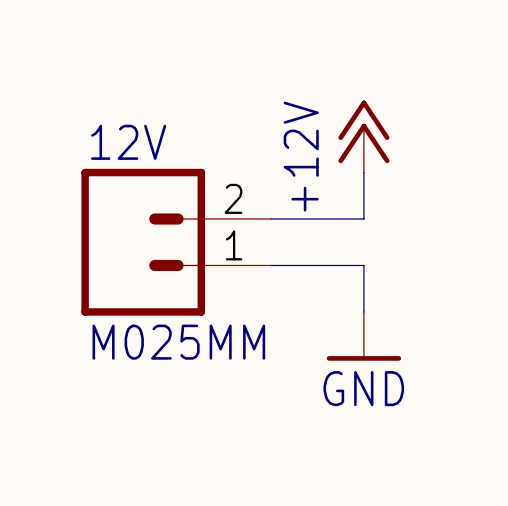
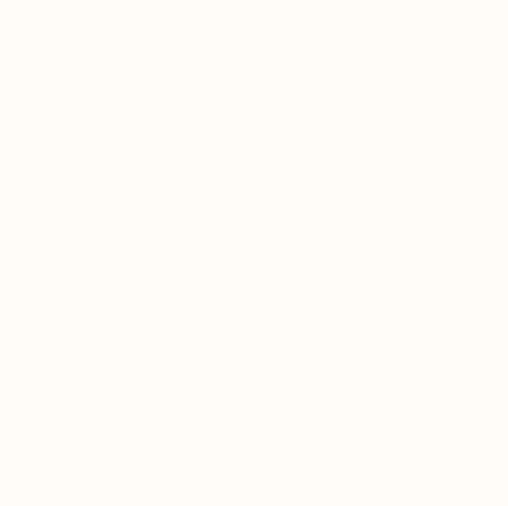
power symbol: +12V (363, 136) -> none
wire: (363, 172) (363, 219) (271, 219) -> none
12V: M025MM (176, 242) -> none
wire: (271, 265) (363, 265) (363, 311) -> none
power symbol: GND (363, 336) -> none

